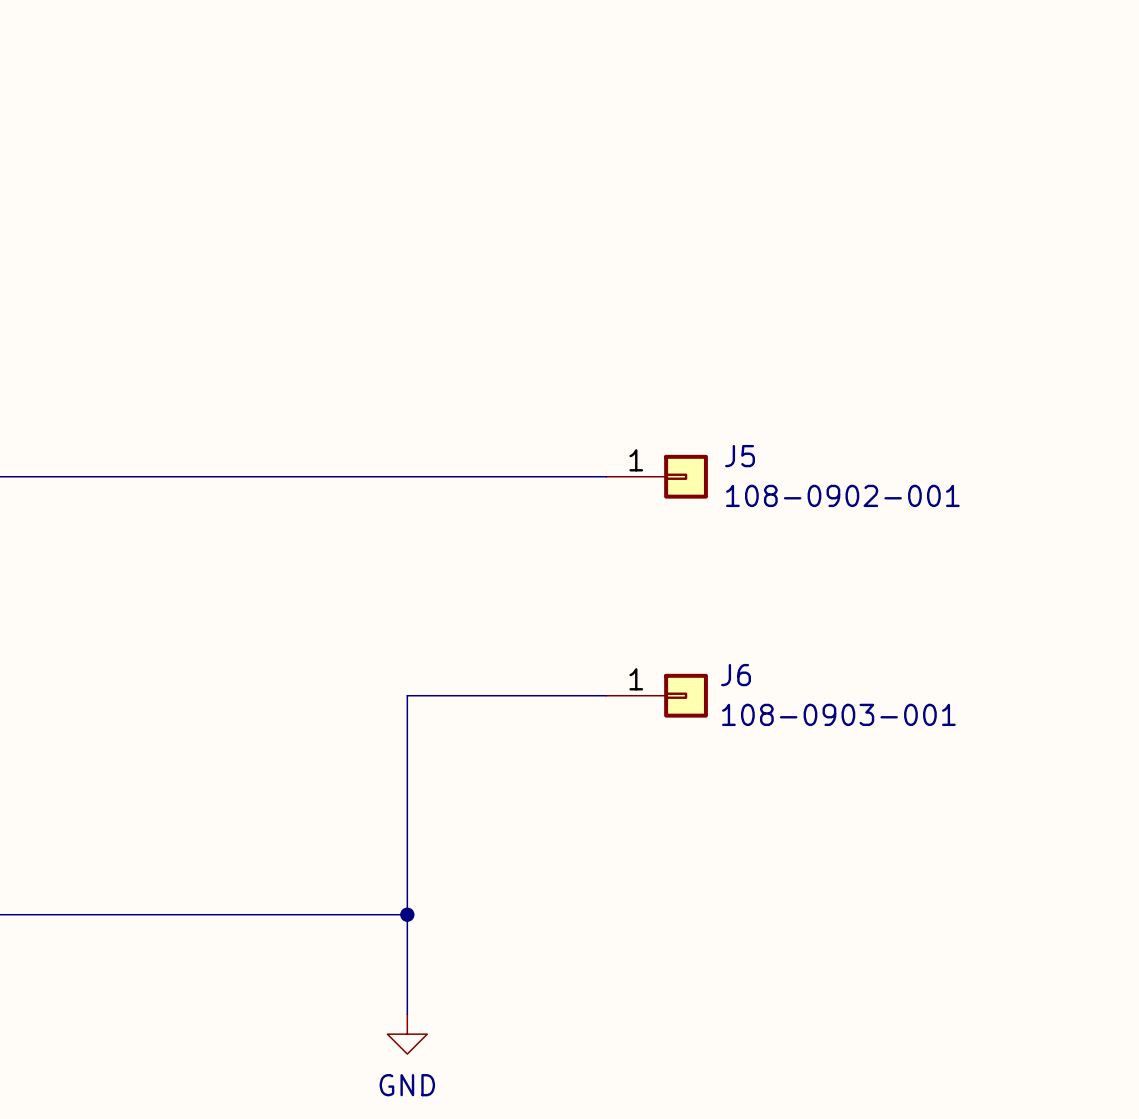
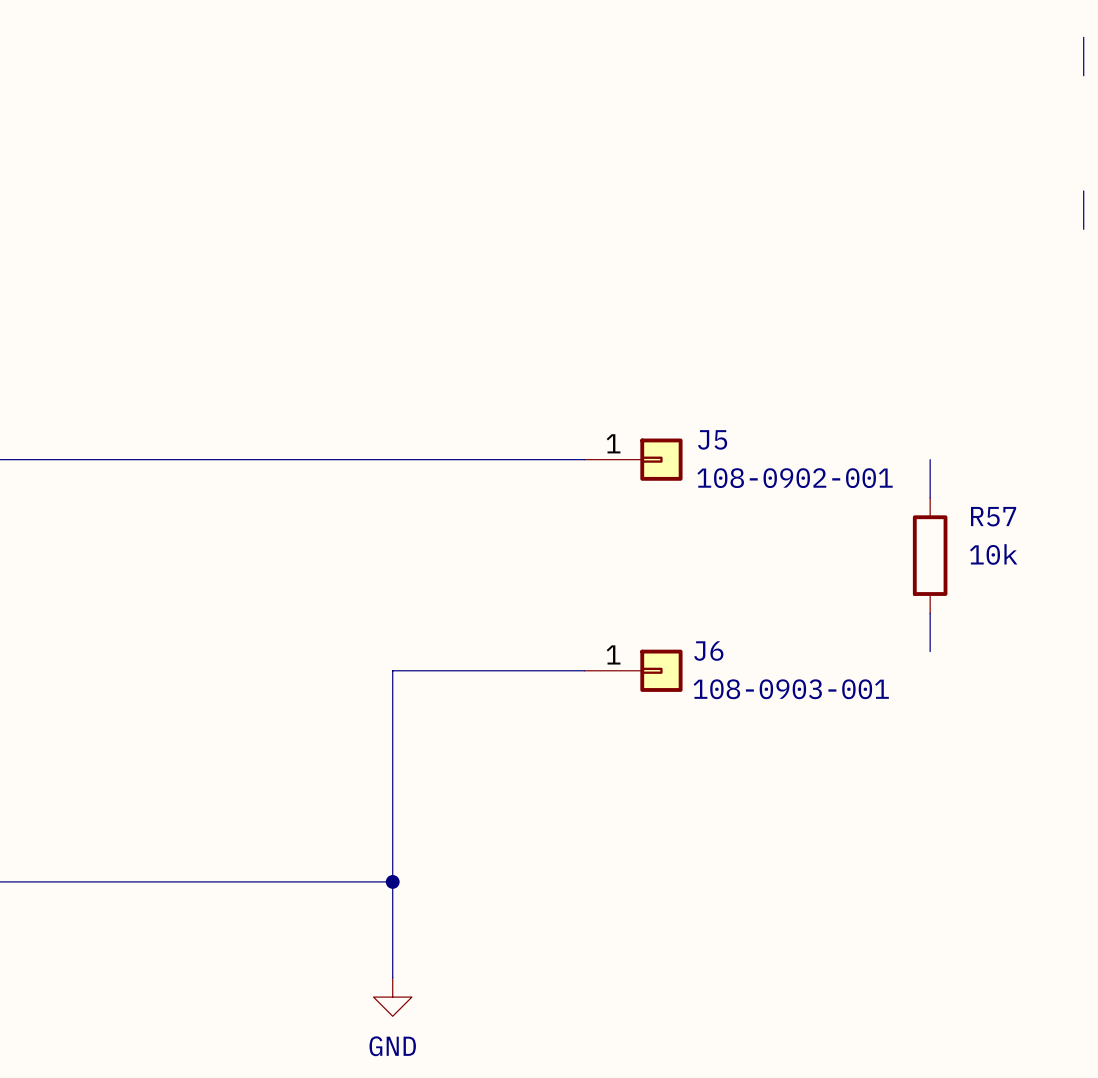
wire: none -> (1083, 37) (1083, 75)
wire: none -> (1083, 190) (1083, 229)
wire: none -> (930, 459) (930, 498)
R57: none -> 10k (930, 555)
wire: none -> (930, 613) (930, 651)

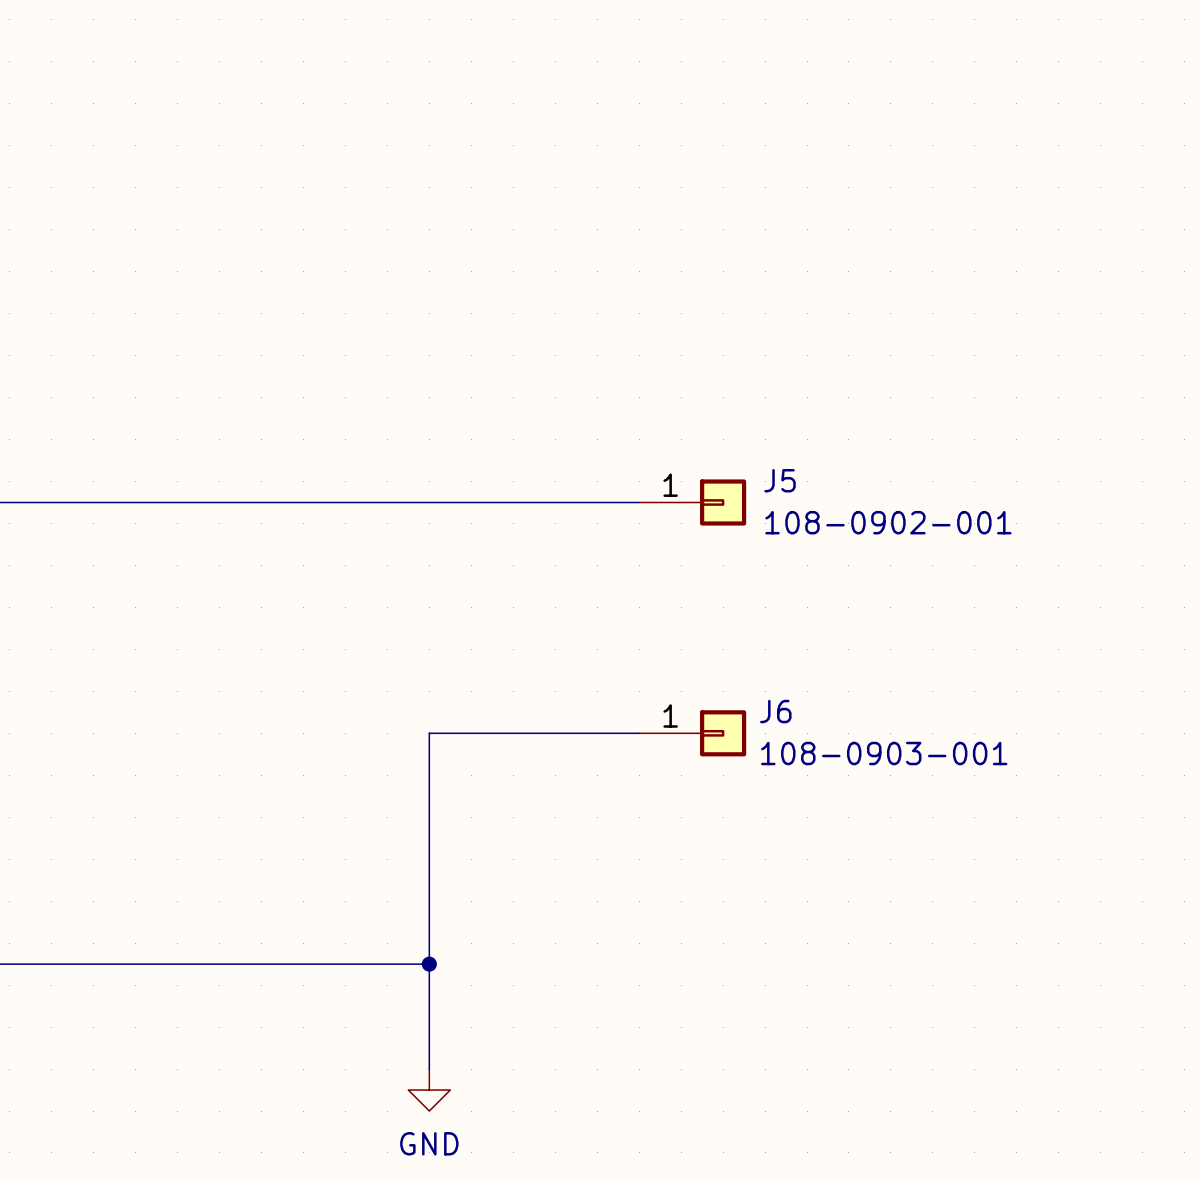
wire: (1083, 37) (1083, 75) -> none
wire: (1083, 190) (1083, 229) -> none
wire: (930, 459) (930, 498) -> none
R57: 10k (930, 555) -> none
wire: (930, 613) (930, 651) -> none

